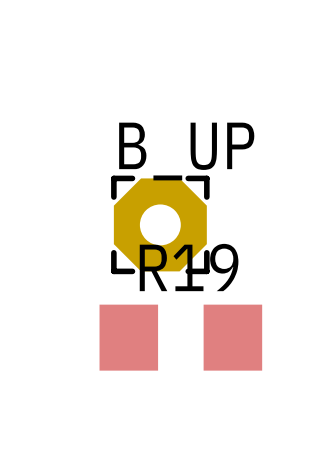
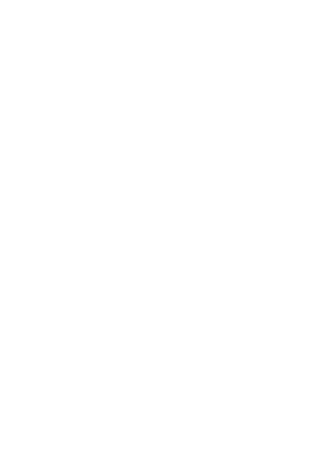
B_UP: (160, 224) -> none
R19: (180, 337) -> none

